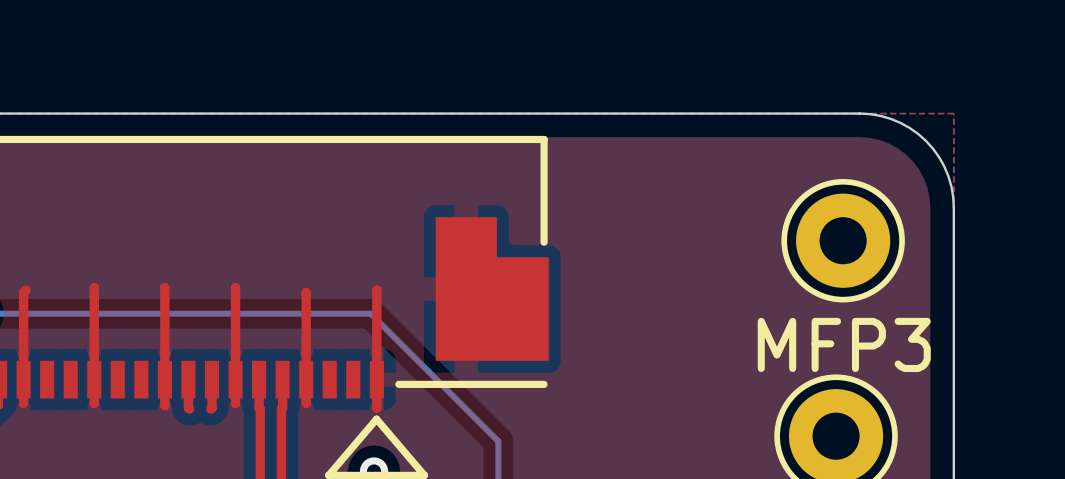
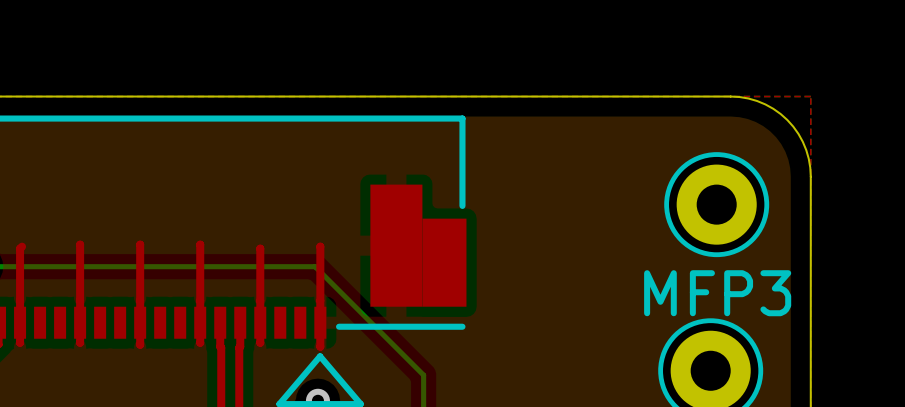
top track: (188, 379) (189, 409) -> none
top track: (211, 379) (210, 409) -> none

